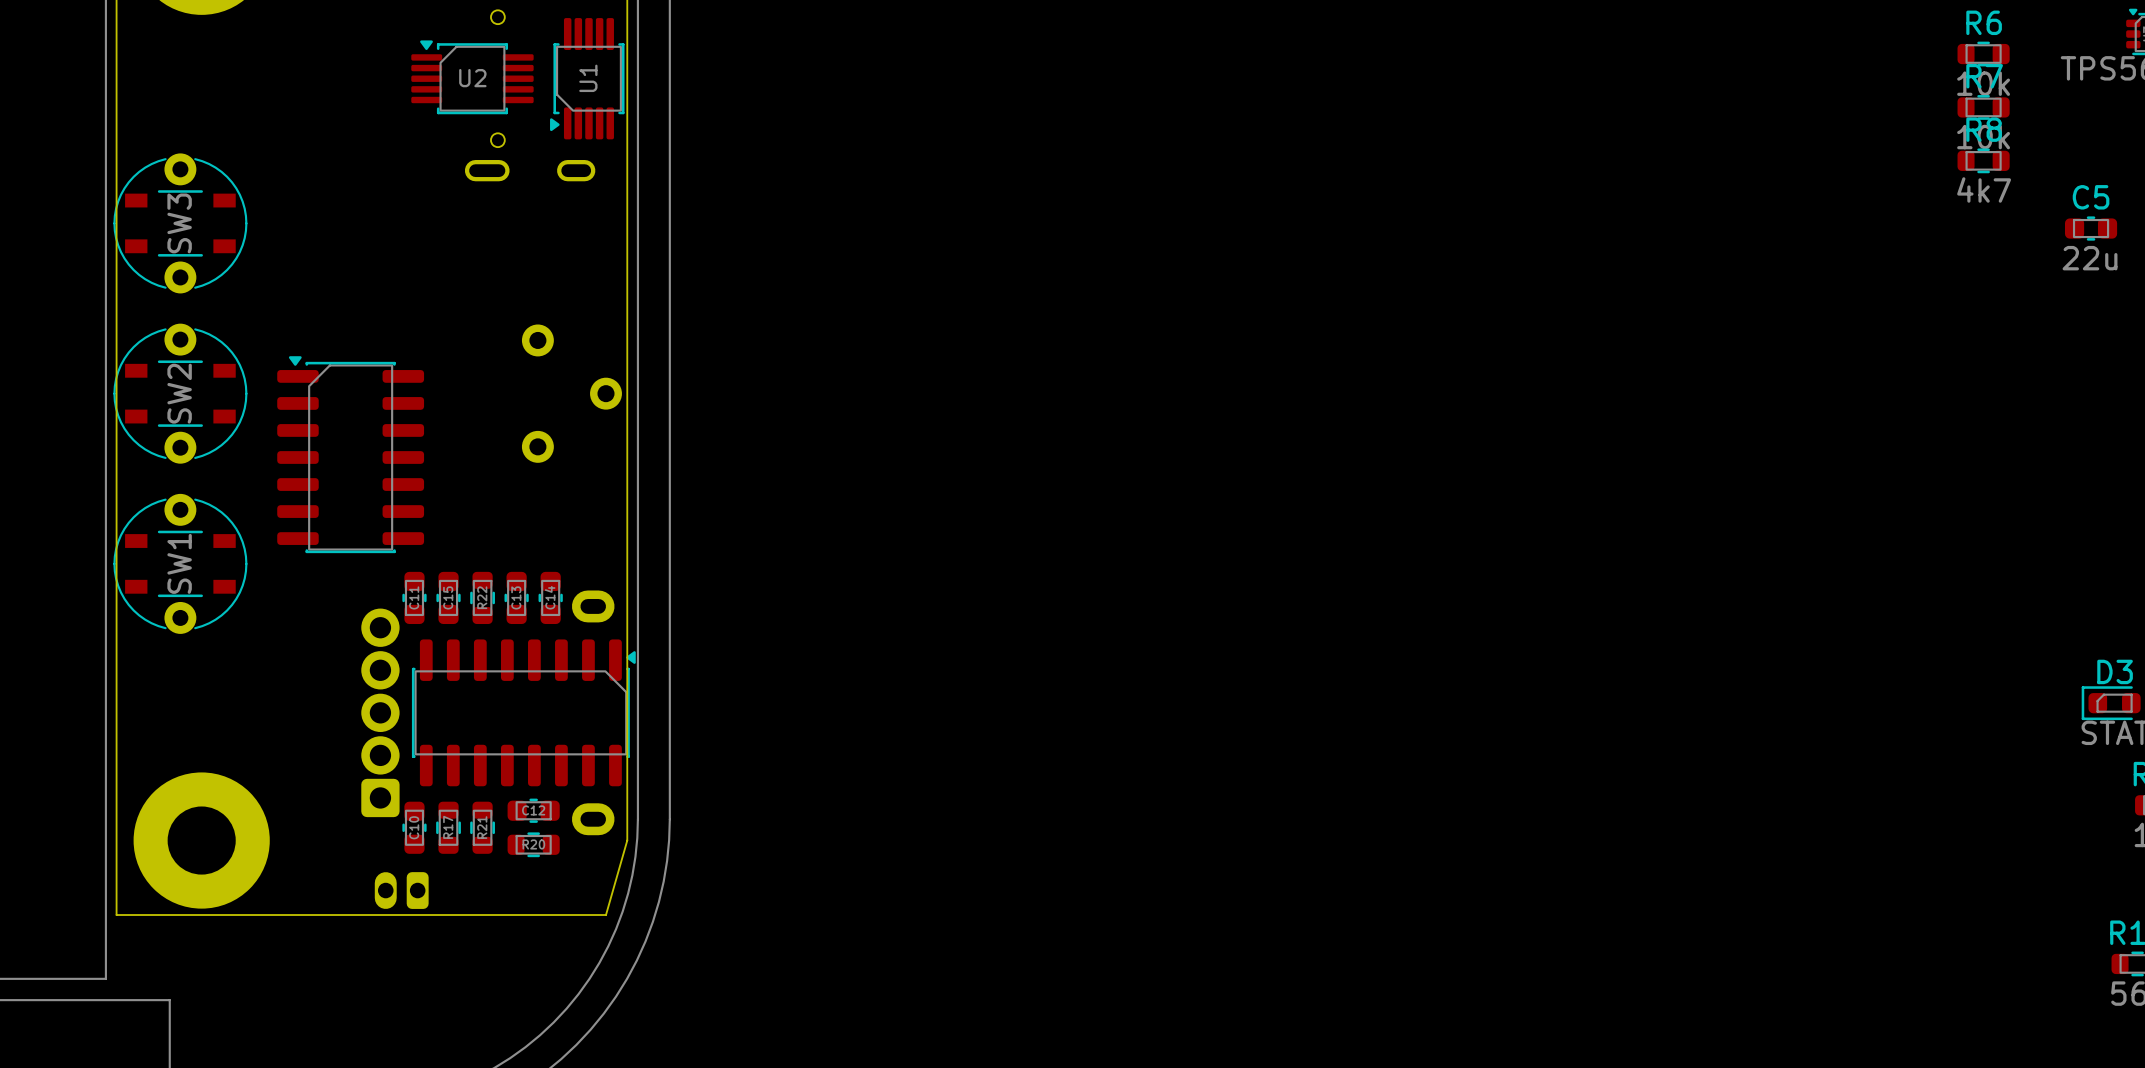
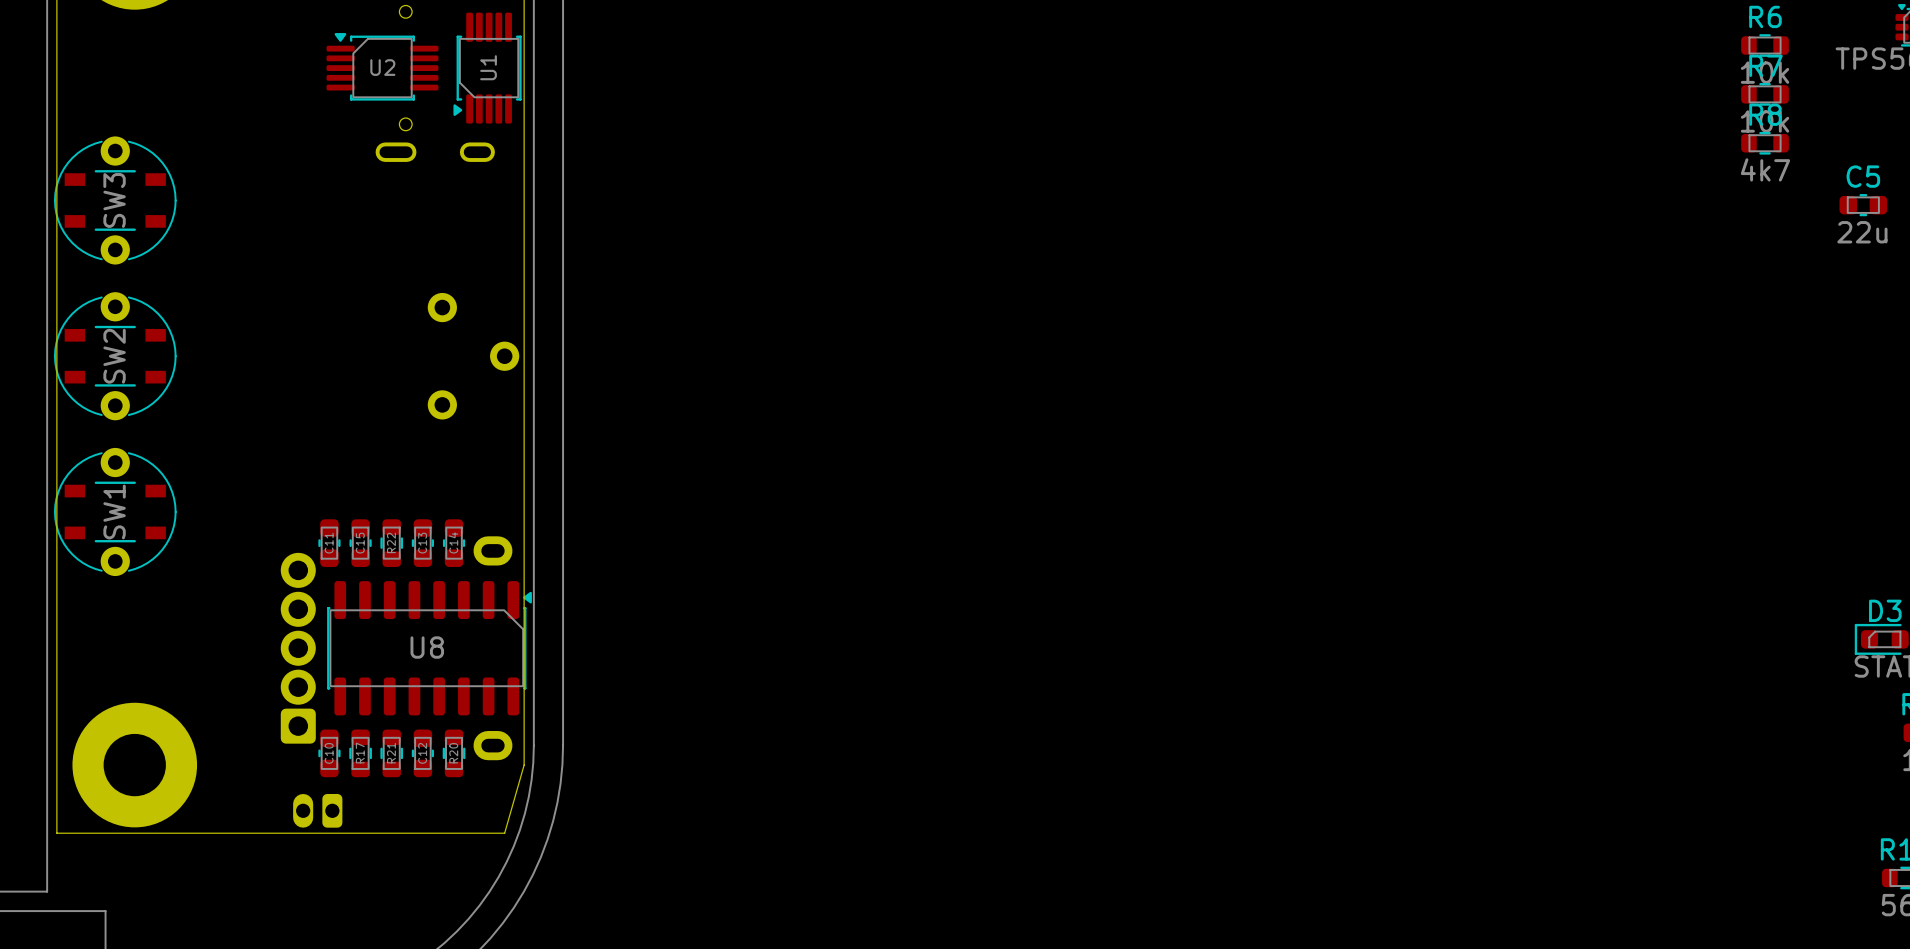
part: (350, 454) -> none
U8 name: none -> U8 (427, 647)
C12 rotation: 0° (533, 810) -> 90° clockwise (422, 753)
R20 rotation: 0° (533, 844) -> 90° clockwise (454, 753)

